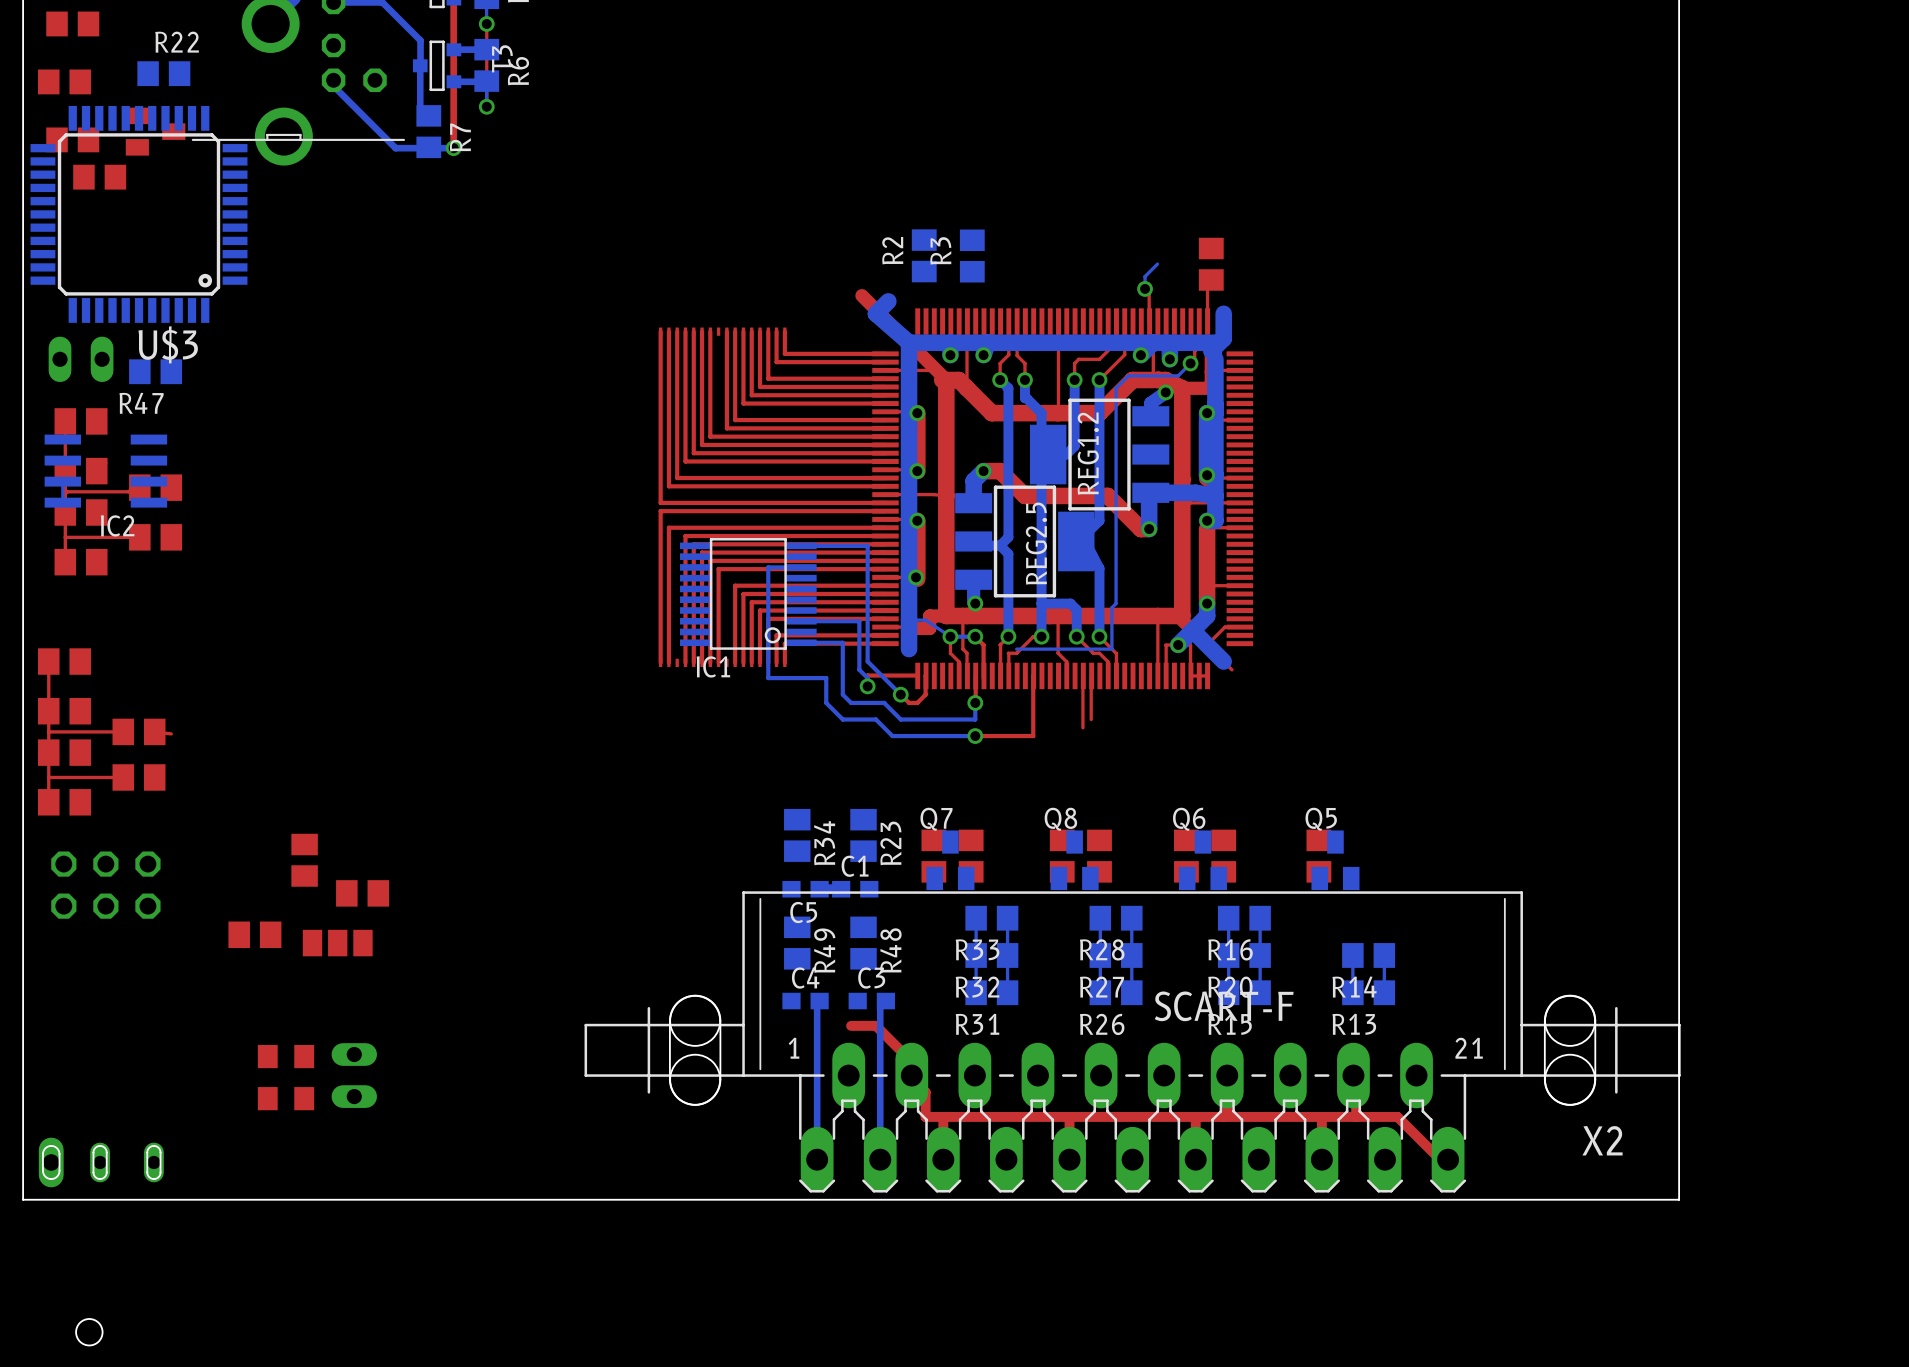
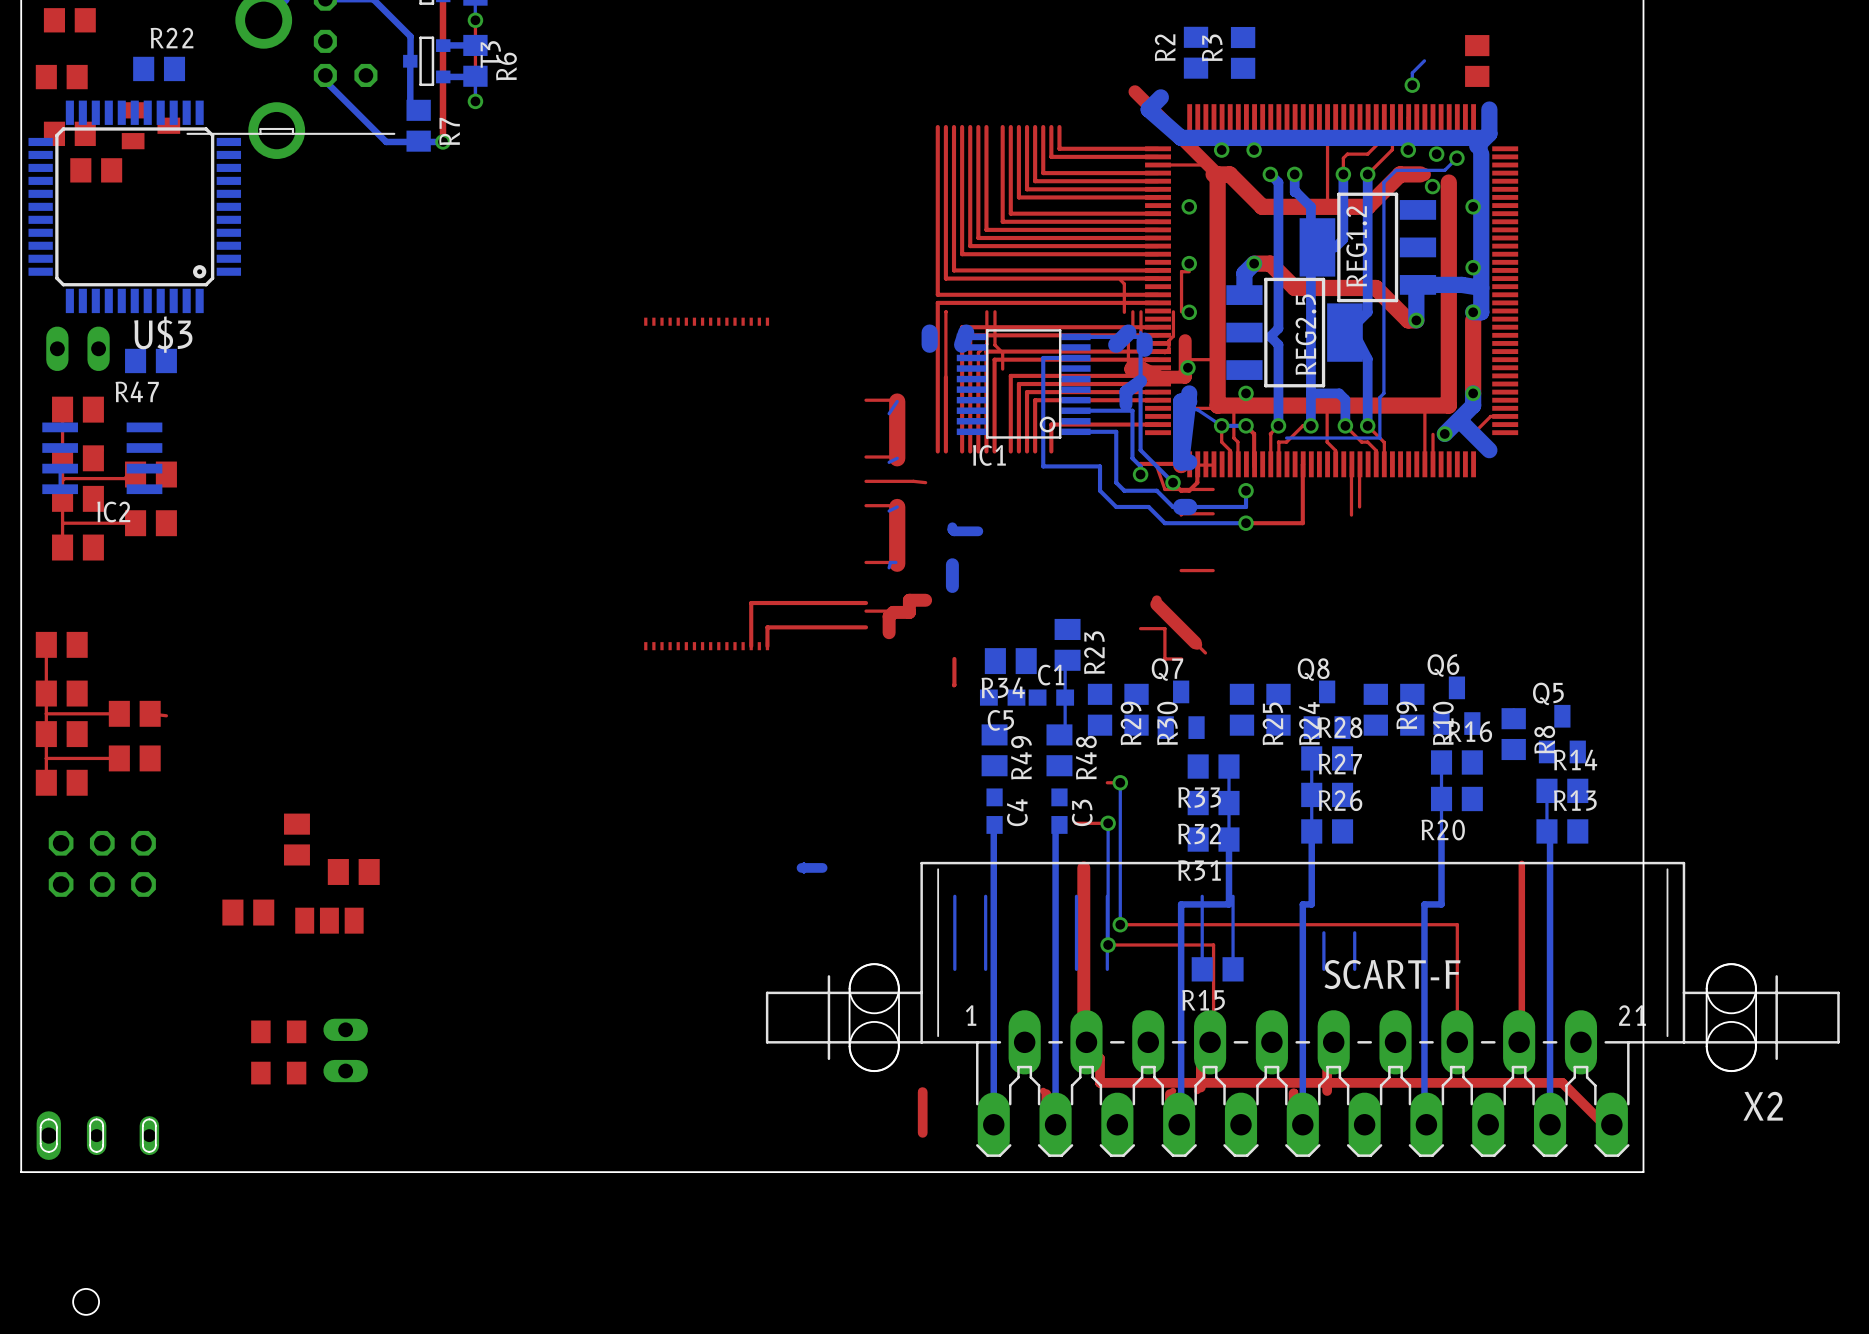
via: none -> (1412, 85)
bottom track: none -> (1160, 97) (1148, 109) (1181, 137) (1481, 137) (1481, 154)
via: none -> (1221, 150)
via: none -> (1254, 150)
via: none -> (1408, 150)
via: none -> (1436, 154)
bottom track: none -> (1481, 154) (1481, 312) (1473, 312)
via: none -> (1456, 158)
via: none -> (1270, 174)
via: none -> (1294, 174)
via: none -> (1343, 174)
via: none -> (1367, 174)
via: none -> (1432, 186)
via: none -> (1189, 206)
via: none -> (1473, 206)
R2 position: (924, 255) -> (1196, 52)
R3 position: (972, 256) -> (1243, 52)
bottom track: (1157, 264) (1145, 276) (1145, 288) -> (1424, 60) (1412, 73) (1412, 85)
part position: (1211, 264) -> (1477, 61)
via: none -> (1189, 263)
via: none -> (1254, 263)
via: none -> (1473, 267)
via: (1145, 288) -> none
top track: (861, 295) (946, 380) (946, 616) (1182, 616) (1182, 388) -> (1134, 91) (1217, 174) (1217, 405) (1448, 405) (1448, 182)
bottom track: (888, 301) (875, 313) (909, 342) -> none
bottom track: (1223, 313) (1223, 338) (1211, 351) (1215, 359) -> (1489, 109) (1489, 133) (1477, 146) (1481, 154)
top track: (1058, 321) (1058, 413) -> (1327, 117) (1327, 206)
top track: (1116, 321) (1116, 342) (1099, 359) (1078, 359) (1074, 363) (1074, 380) -> (1384, 117) (1384, 137) (1367, 154) (1347, 154) (1343, 158) (1343, 174)
top track: (1124, 321) (1124, 354) (1099, 380) -> (1392, 117) (1392, 149) (1367, 174)
via: none -> (1189, 312)
via: none -> (1473, 312)
via: none -> (1416, 320)
top track: (660, 331) (660, 502) (885, 502) -> (937, 127) (937, 294) (1158, 294)
top track: (668, 331) (668, 486) (885, 486) -> (945, 127) (945, 278) (1158, 278)
top track: (677, 331) (677, 478) (885, 478) -> (954, 127) (954, 270) (1158, 270)
top track: (685, 331) (685, 461) (885, 461) -> (962, 127) (962, 254) (1158, 254)
top track: (693, 331) (693, 453) (885, 453) -> (970, 127) (970, 246) (1158, 246)
top track: (702, 331) (702, 444) (885, 444) -> (978, 127) (978, 238) (1158, 238)
top track: (710, 331) (710, 436) (885, 436) -> (986, 127) (986, 229) (1158, 229)
top track: (726, 331) (726, 428) (885, 428) -> (1002, 127) (1002, 221) (1158, 221)
top track: (735, 331) (735, 420) (885, 420) -> (1010, 127) (1010, 213) (1158, 213)
top track: (743, 331) (743, 403) (885, 403) -> (1018, 127) (1018, 197) (1158, 197)
top track: (751, 331) (751, 395) (885, 395) -> (1027, 127) (1027, 189) (1158, 189)
top track: (760, 331) (760, 386) (885, 386) -> (1035, 127) (1035, 181) (1158, 181)
top track: (768, 331) (768, 378) (885, 378) -> (1043, 127) (1043, 173) (1158, 173)
top track: (776, 331) (776, 362) (885, 362) -> (1051, 127) (1051, 156) (1158, 156)
top track: (784, 331) (784, 353) (885, 353) -> (1059, 127) (1059, 148) (1158, 148)
bottom track: (909, 342) (1215, 342) (1215, 359) -> none
bottom track: (909, 342) (909, 649) -> none
via: (950, 355) -> none
via: (983, 355) -> none
via: (1140, 355) -> none
via: (1169, 359) -> none
bottom track: (1215, 359) (1215, 520) -> (1246, 490) (1246, 506) (1189, 506)
bottom track: (1190, 363) (1178, 375) (1128, 375) (1116, 388) (1116, 603) (1111, 607) (1111, 649) (1016, 649) -> (1456, 158) (1444, 170) (1396, 170) (1383, 182) (1383, 393) (1379, 397) (1379, 438) (1286, 438)
via: (1190, 363) -> none
top track: (885, 370) (933, 370) (942, 380) (958, 380) (991, 413) (1099, 413) (1132, 380) (1157, 380) -> (1158, 164) (1205, 164) (1213, 174) (1229, 174) (1262, 206) (1367, 206) (1400, 174) (1424, 174)
via: none -> (1187, 367)
top track: none -> (978, 369) (978, 451)
bottom track: (1000, 380) (1008, 388) (1008, 537) (1000, 545) (1008, 553) (1008, 636) -> (1270, 174) (1278, 182) (1278, 328) (1270, 336) (1278, 344) (1278, 425)
via: (1000, 380) -> none
bottom track: (1024, 380) (1024, 398) (1041, 413) (1041, 429) (1058, 446) (1049, 454) -> (1294, 174) (1294, 192) (1310, 206) (1310, 223) (1327, 239) (1319, 247)
via: (1024, 380) -> none
bottom track: (1074, 380) (1074, 446) (1066, 454) (1048, 454) -> (1343, 174) (1343, 239) (1335, 247) (1317, 247)
via: (1074, 380) -> none
bottom track: (1099, 380) (1099, 520) (1083, 538) -> (1367, 174) (1367, 312) (1352, 329)
via: (1099, 380) -> none
top track: none -> (945, 377) (945, 451)
via: (1165, 392) -> none
via: none -> (1246, 393)
via: none -> (1473, 393)
via: (917, 413) -> none
via: (1207, 413) -> none
via: none -> (1221, 425)
via: none -> (1246, 425)
via: none -> (1278, 425)
via: none -> (1310, 425)
via: none -> (1345, 425)
via: none -> (1367, 425)
bottom track: none -> (1076, 431) (1116, 431) (1116, 482) (1124, 490) (1156, 490) (1173, 506) (1181, 506)
via: none -> (1444, 433)
bottom track: (1048, 454) (1041, 461) (1041, 636) -> (1317, 247) (1310, 253) (1310, 425)
REG1.2 position: (1099, 454) -> (1367, 247)
via: (917, 471) -> none
top track: (983, 471) (1000, 471) (1024, 495) (1107, 495) (1140, 529) (1149, 529) -> (1254, 263) (1270, 263) (1294, 287) (1375, 287) (1408, 320) (1416, 320)
bottom track: (983, 471) (973, 481) (973, 503) -> (1254, 263) (1244, 273) (1244, 295)
via: (983, 471) -> none
via: (1207, 475) -> none
via: none -> (1140, 474)
via: none -> (1173, 482)
bottom track: (1215, 495) (1195, 492) (1150, 492) (1149, 494) (1149, 529) -> (1481, 287) (1461, 284) (1417, 284) (1416, 286) (1416, 320)
part position: (1062, 498) -> (1331, 290)
via: none -> (1246, 490)
top track: (885, 511) (660, 511) (660, 662) -> (1158, 302) (937, 302) (937, 451)
via: (917, 520) -> none
top track: (1207, 520) (1207, 603) -> (1473, 312) (1473, 393)
via: (1207, 520) -> none
top track: (885, 527) (668, 527) (668, 662) -> none
via: (1149, 529) -> none
top track: (885, 536) (685, 536) (685, 662) -> (1158, 327) (962, 327) (962, 451)
via: none -> (1246, 523)
bottom track: (1083, 538) (1099, 568) (1099, 636) -> (1352, 329) (1367, 358) (1367, 425)
REG2.5 position: (1024, 541) -> (1294, 332)
top track: (885, 544) (693, 544) (693, 662) -> (1158, 335) (970, 335) (970, 451)
bottom track: (801, 545) (867, 545) (867, 661) (900, 694) -> (1076, 336) (1140, 336) (1140, 450) (1173, 482)
top track: (885, 552) (702, 552) (702, 662) -> none
top track: (885, 560) (710, 560) (710, 662) -> (1158, 351) (986, 351) (986, 451)
bottom track: (801, 567) (768, 567) (768, 678) (826, 678) (826, 702) (842, 719) (875, 719) (892, 736) (975, 736) -> (1076, 357) (1043, 357) (1043, 466) (1100, 466) (1100, 490) (1116, 506) (1148, 506) (1164, 523) (1246, 523)
top track: (885, 569) (718, 569) (718, 662) -> (1158, 359) (994, 359) (994, 451)
via: (916, 577) -> none
top track: (885, 585) (735, 585) (735, 662) -> (1158, 375) (1010, 375) (1010, 451)
IC1 position: (748, 593) -> (1023, 383)
top track: (885, 593) (743, 593) (743, 662) -> (1158, 384) (1018, 384) (1018, 451)
top track: (885, 602) (751, 602) (751, 662) -> (1158, 392) (1027, 392) (1027, 451)
via: (975, 603) -> none
bottom track: (1041, 603) (1070, 603) (1076, 609) (1076, 636) -> (1310, 393) (1339, 393) (1345, 399) (1345, 425)
bottom track: (1207, 603) (1207, 616) (1178, 644) -> (1473, 393) (1473, 405) (1444, 433)
via: (1207, 603) -> none
top track: (885, 610) (760, 610) (760, 662) -> (1158, 400) (1035, 400) (1035, 451)
top track: (1157, 611) (1157, 675) -> (1424, 401) (1424, 464)
top track: (962, 616) (962, 649) (967, 653) (967, 675) -> (1233, 405) (1233, 438) (1237, 442) (1238, 464)
top track: (1049, 616) (1053, 620) (1058, 620) (1058, 653) (1066, 661) (1066, 675) -> (1319, 405) (1323, 409) (1327, 409) (1327, 442) (1335, 450) (1335, 464)
bottom track: (909, 620) (925, 620) (950, 636) (975, 636) -> (1181, 409) (1197, 409) (1221, 425) (1246, 425)
bottom track: (801, 621) (859, 621) (859, 669) (867, 678) (867, 686) -> (1076, 410) (1132, 410) (1132, 458) (1140, 466) (1140, 474)
top track: (1239, 627) (1225, 627) (1207, 644) -> (1505, 416) (1490, 416) (1473, 433)
bottom track: (1190, 632) (1194, 632) (1223, 661) -> (1456, 421) (1460, 421) (1489, 450)
top track: (885, 635) (776, 635) (776, 662) -> (1158, 424) (1051, 424) (1051, 451)
top track: (950, 636) (950, 653) (959, 661) (959, 675) -> (1221, 425) (1221, 442) (1230, 450) (1230, 464)
via: (950, 636) -> none
top track: (975, 636) (983, 644) (983, 678) -> (1246, 425) (1254, 433) (1254, 466)
via: (975, 636) -> none
top track: (1008, 636) (1000, 644) (1000, 675) -> (1278, 425) (1270, 433) (1270, 464)
via: (1008, 636) -> none
top track: (1041, 636) (1033, 636) (1016, 653) (1008, 653) (1008, 675) -> (1310, 425) (1302, 425) (1286, 442) (1278, 442) (1278, 464)
via: (1041, 636) -> none
top track: (1076, 636) (1093, 653) (1099, 653) (1108, 661) (1108, 675) -> (1345, 425) (1361, 442) (1367, 442) (1376, 450) (1376, 464)
via: (1076, 636) -> none
top track: (1099, 636) (1116, 653) (1116, 675) -> (1367, 425) (1384, 442) (1384, 464)
via: (1099, 636) -> none
bottom track: (801, 642) (842, 642) (842, 694) (851, 702) (884, 702) (900, 719) (975, 719) (975, 702) -> none
via: (1178, 644) -> none
top track: (1166, 645) (1165, 675) -> (1432, 434) (1432, 463)
top track: (917, 675) (867, 675) (867, 686) -> (1189, 464) (1140, 463) (1140, 474)
top track: (926, 675) (925, 694) (917, 702) (909, 702) (900, 694) -> (1197, 464) (1197, 482) (1189, 490) (1181, 490) (1173, 482)
top track: (1033, 675) (1033, 736) (975, 736) -> (1303, 464) (1302, 523) (1246, 523)
bottom track: none -> (1067, 660) (1065, 665) (1065, 729) (1059, 734)
top track: (1082, 678) (1082, 727) -> (1351, 466) (1351, 515)
top track: (1091, 678) (1091, 719) -> (1359, 466) (1359, 506)
via: (867, 686) -> none
via: (900, 694) -> none
via: (975, 702) -> none
via: (975, 736) -> none
bottom track: none -> (1311, 758) (1311, 904) (1302, 904) (1302, 1124)
bottom track: none -> (1441, 762) (1441, 904) (1424, 904) (1424, 1122) (1426, 1124)
bottom track: none -> (1228, 766) (1228, 904) (1181, 904) (1181, 1122) (1179, 1124)
top track: none -> (1120, 782) (1107, 782)
bottom track: none -> (1120, 782) (1120, 924)
via: none -> (1120, 782)
bottom track: none -> (1546, 790) (1546, 831) (1550, 835) (1550, 1124)
R34 rotation: 0° (797, 835) -> 90° clockwise (1010, 661)
R34 position: (797, 835) -> (1010, 661)
R23 position: (863, 835) -> (1067, 644)
top track: none -> (1108, 823) (1075, 823)
bottom track: none -> (1108, 823) (1108, 944)
via: none -> (1108, 823)
bottom track: none -> (994, 824) (993, 1124)
bottom track: none -> (1059, 824) (1055, 828) (1055, 1124)
R29 side: top (933, 856) -> bottom (1100, 709)
R30 side: top (971, 856) -> bottom (1136, 709)
R24 side: top (1062, 856) -> bottom (1278, 709)
R25 side: top (1099, 856) -> bottom (1241, 709)
R10 side: top (1186, 856) -> bottom (1412, 709)
R9 side: top (1223, 856) -> bottom (1375, 709)
R8 side: top (1318, 856) -> bottom (1513, 734)
Q7 position: (950, 860) -> (1181, 709)
Q8 position: (1074, 860) -> (1327, 709)
Q6 position: (1202, 860) -> (1456, 705)
Q5 position: (1335, 860) -> (1562, 734)
top track: none -> (1521, 863) (1521, 1039) (1519, 1042)
C5 position: (805, 889) -> (1002, 697)
C1 position: (855, 889) -> (1051, 697)
top track: none -> (1083, 867) (1083, 1042) (1100, 1058) (1100, 1082) (1562, 1082) (1604, 1124) (1611, 1124)
R33 position: (991, 918) -> (1213, 766)
R28 position: (1116, 918) -> (1327, 758)
R16 position: (1244, 918) -> (1456, 762)
R49 position: (797, 943) -> (994, 750)
R48 position: (863, 943) -> (1059, 750)
top track: none -> (1120, 924) (1457, 924) (1457, 1042)
via: none -> (1120, 924)
R28 name position: R28 (1102, 949) -> R28 (1340, 727)
R16 name position: R16 (1230, 949) -> R16 (1470, 731)
R32 position: (991, 955) -> (1213, 803)
R27 position: (1116, 955) -> (1327, 794)
R20 position: (1244, 955) -> (1456, 798)
R14 position: (1368, 955) -> (1562, 790)
top track: none -> (1108, 944) (1213, 944) (1213, 1042) (1205, 1042)
via: none -> (1108, 944)
R27 name position: R27 (1102, 987) -> R27 (1340, 764)
R14 name position: R14 (1354, 987) -> R14 (1575, 759)
R31 position: (991, 992) -> (1213, 839)
R26 position: (1116, 992) -> (1327, 831)
R13 position: (1368, 992) -> (1562, 831)
C4 rotation: 0° (805, 1001) -> 90° clockwise (994, 811)
C4 position: (805, 1001) -> (994, 811)
bottom track: (819, 1001) (817, 1003) (817, 1159) -> none
C3 rotation: 0° (871, 1001) -> 90° clockwise (1059, 811)
C3 position: (871, 1001) -> (1059, 811)
bottom track: (885, 1001) (880, 1006) (880, 1159) -> none
R26 name position: R26 (1102, 1024) -> R26 (1340, 800)
R13 name position: R13 (1354, 1024) -> R13 (1575, 800)
top track: (851, 1025) (875, 1025) (909, 1058) (909, 1075) (925, 1092) (925, 1116) (1397, 1116) (1440, 1159) (1448, 1159) -> none
X2 position: (1132, 1041) -> (1302, 1009)

